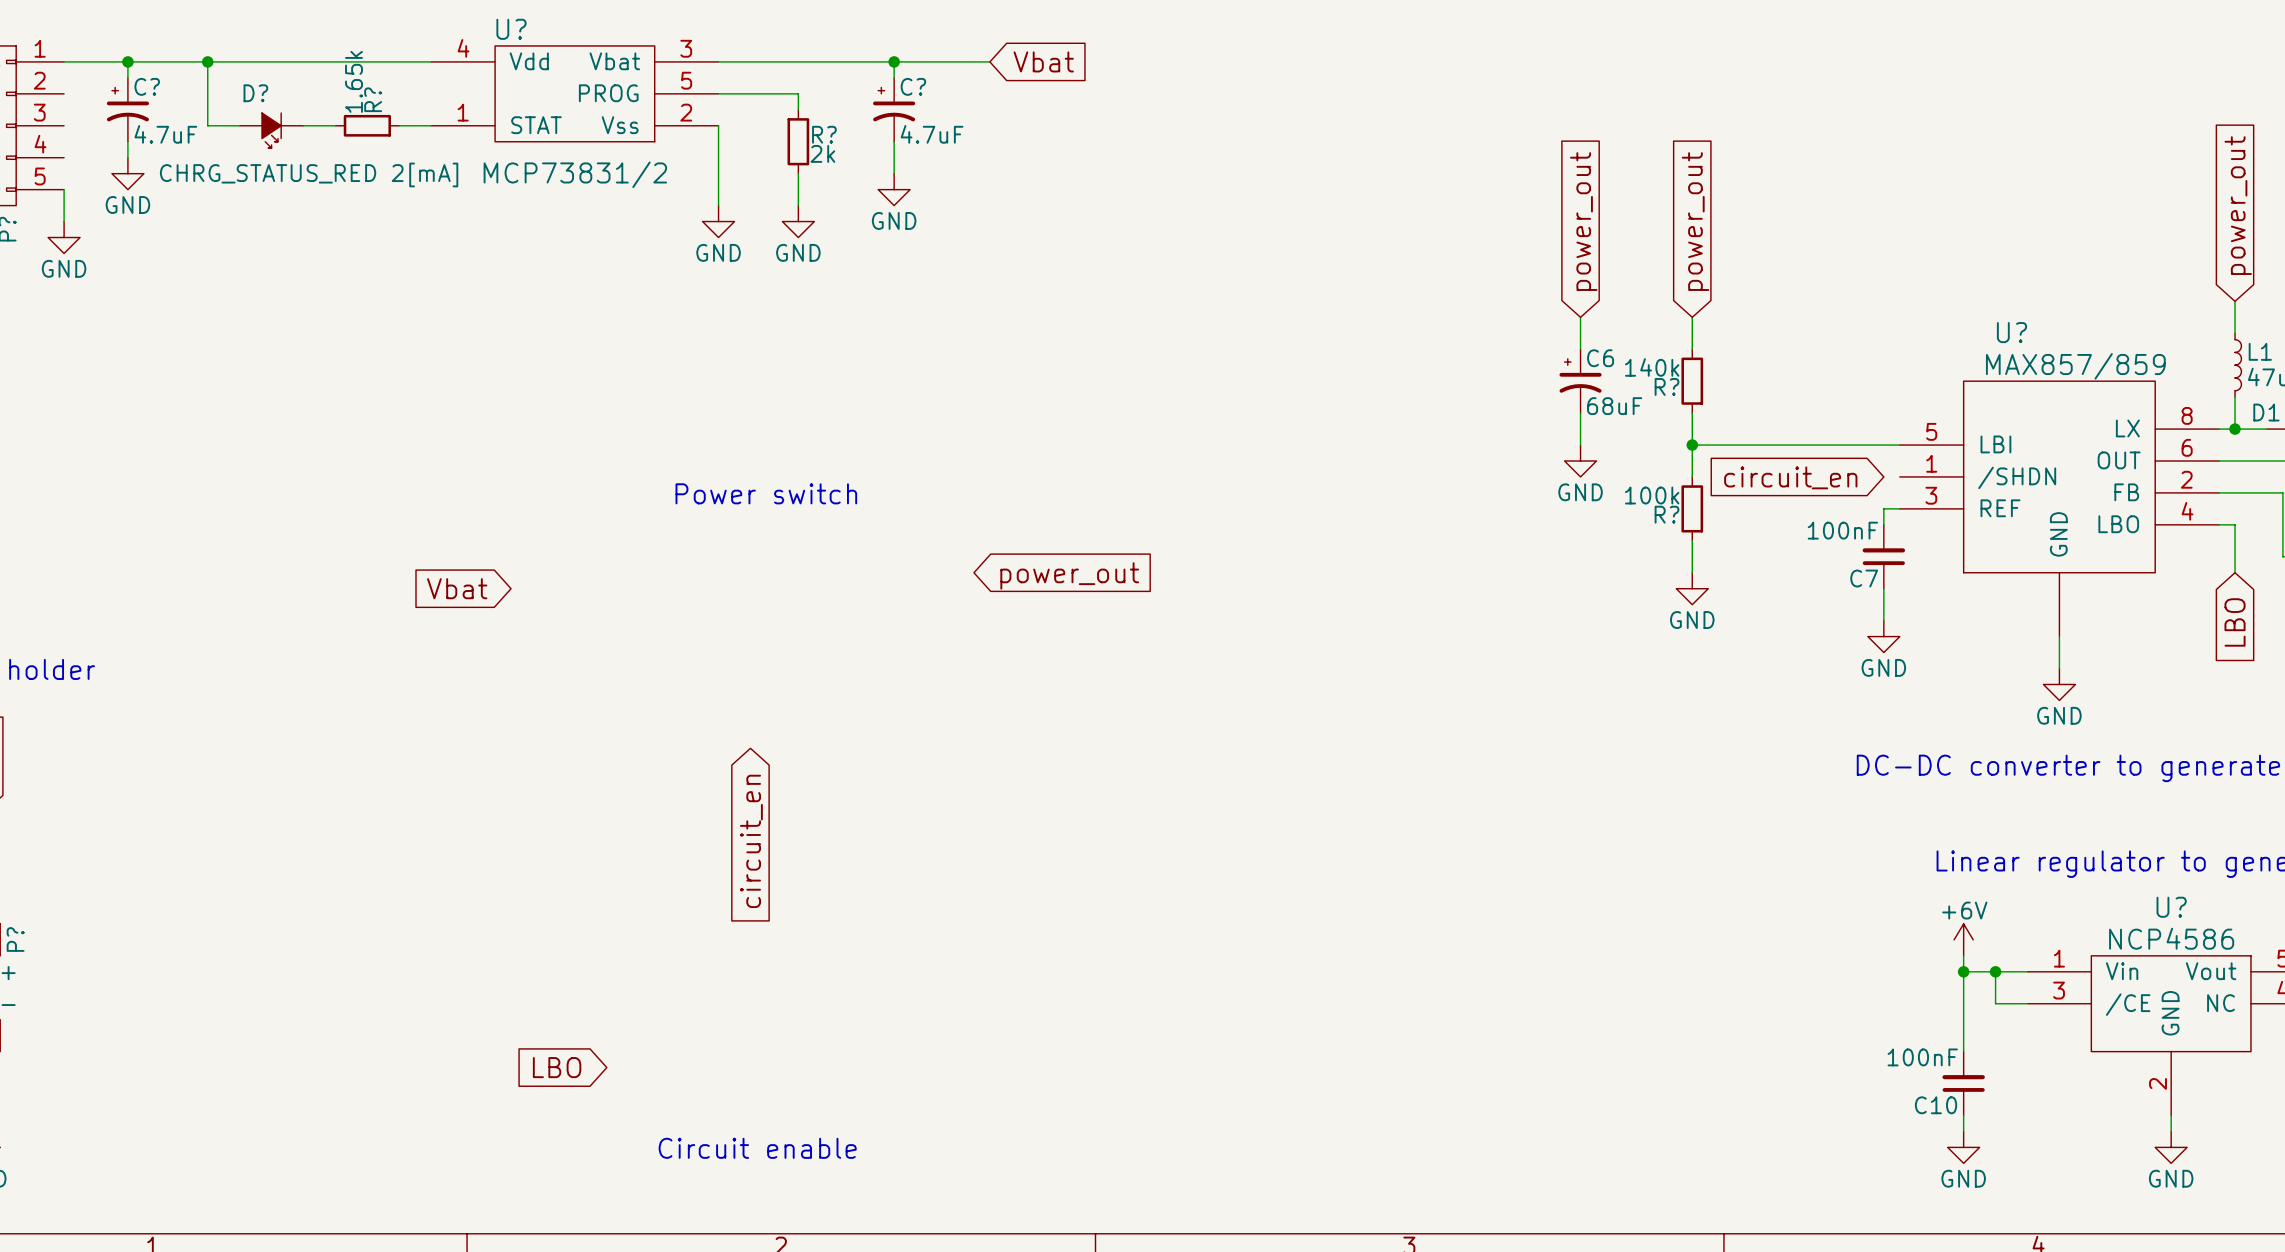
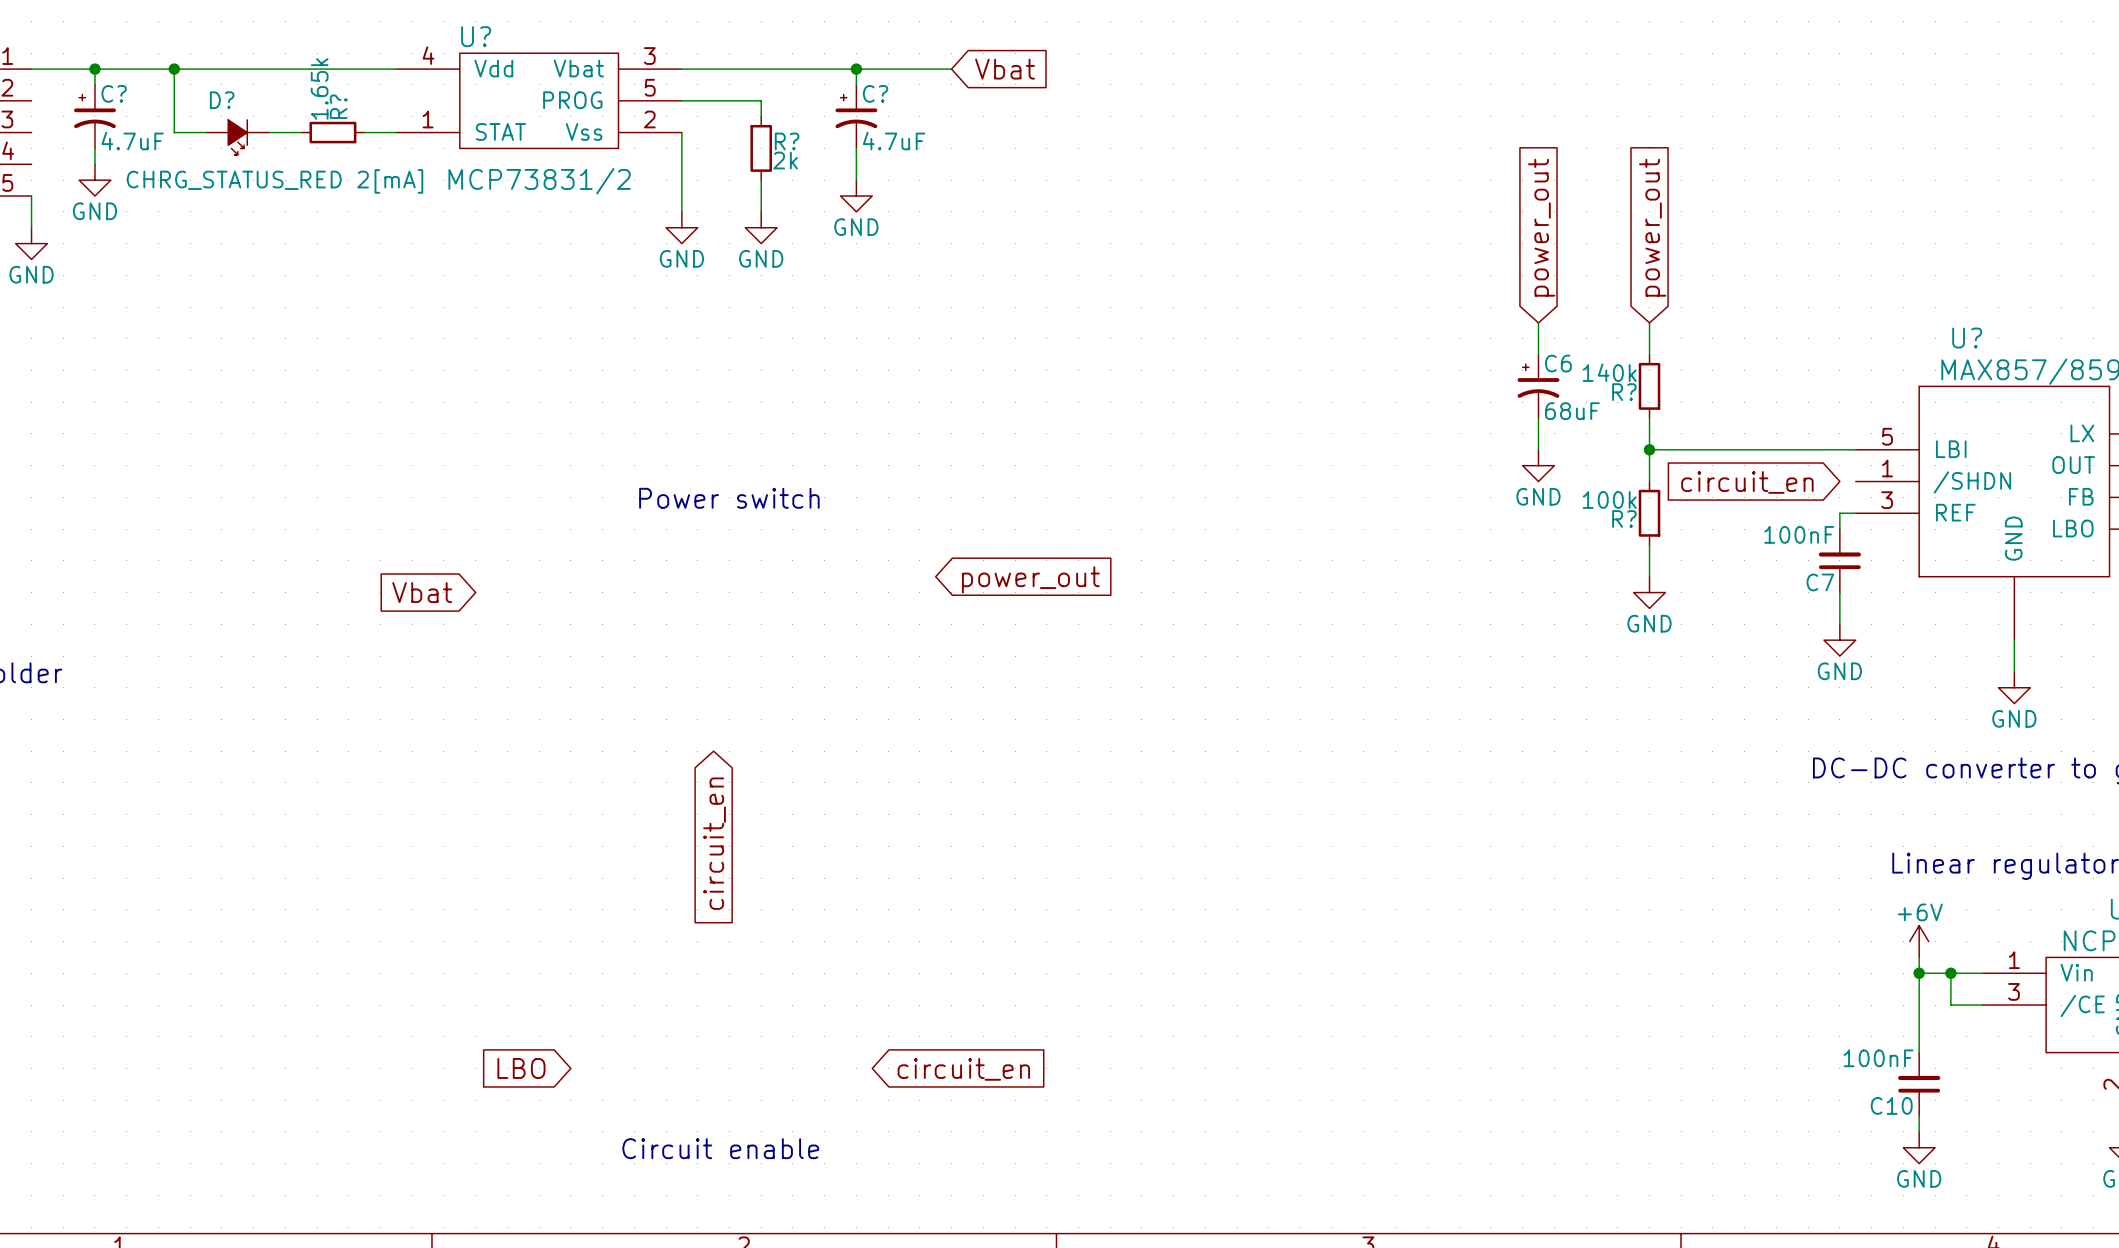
global label: none -> circuit_en (963, 1069)

